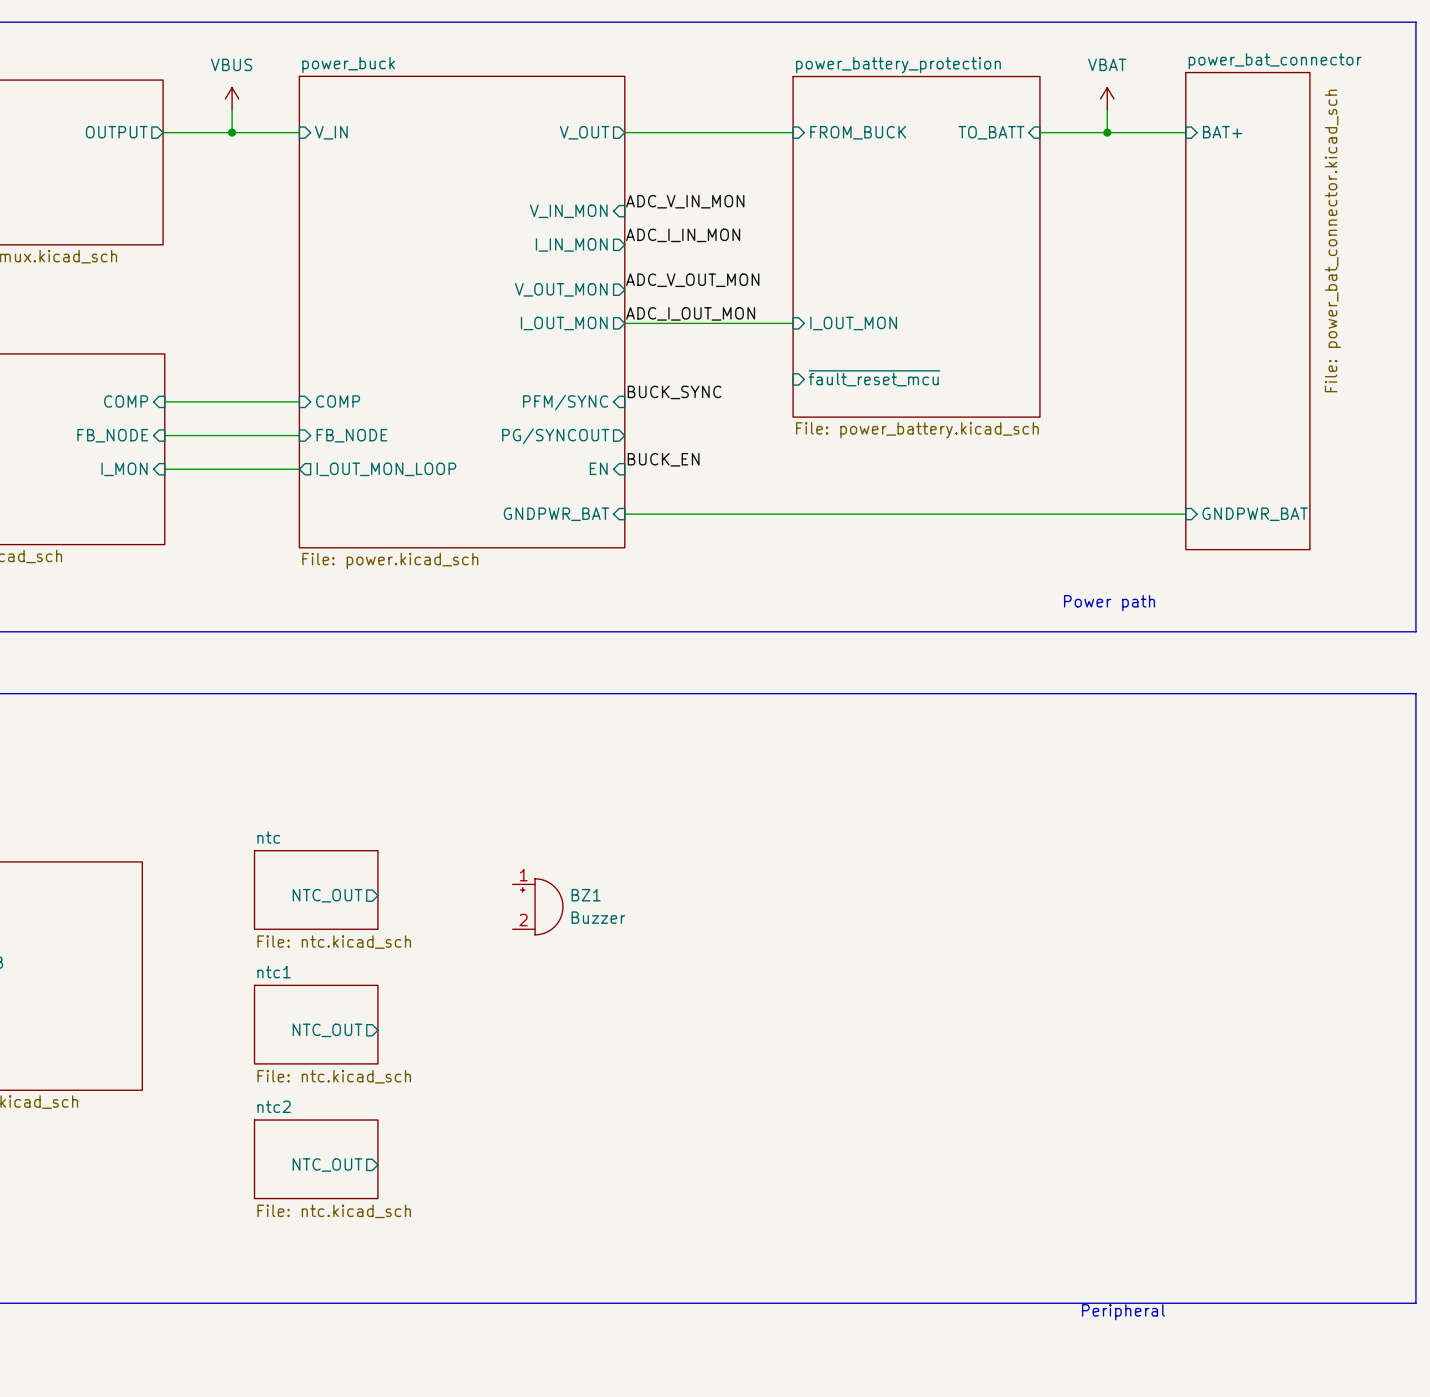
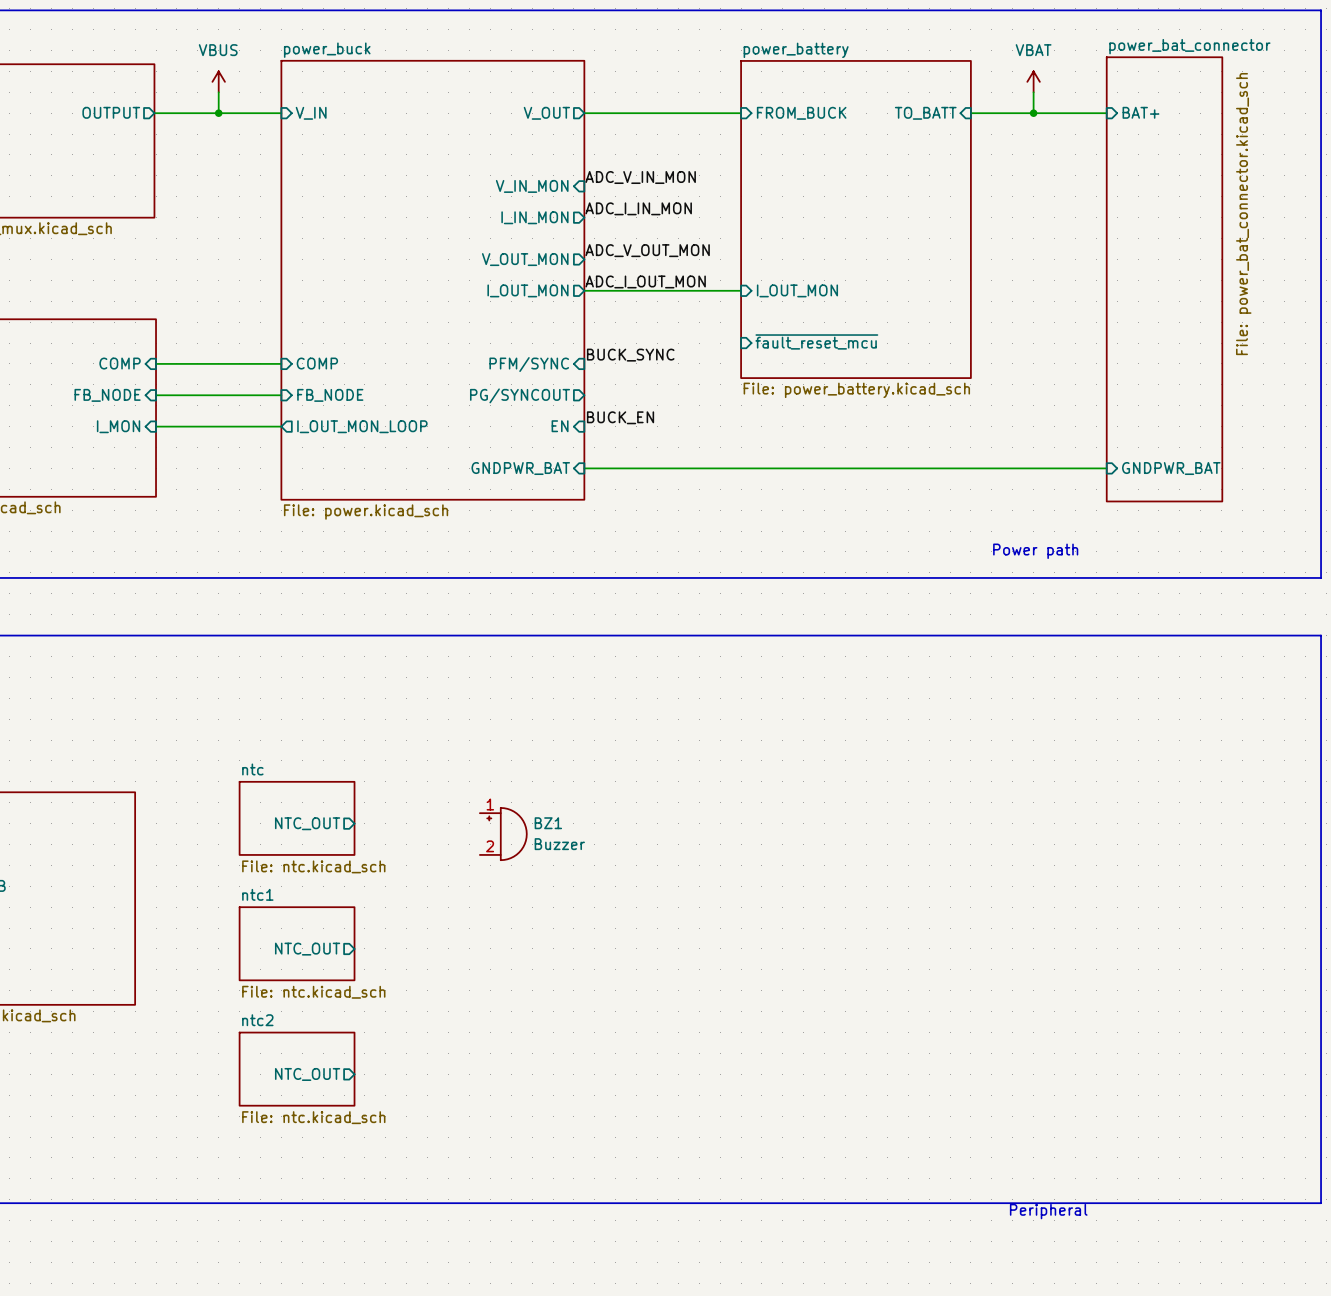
sheet power_battery_protection name: power_battery_protection (898, 65) -> power_battery (796, 50)

